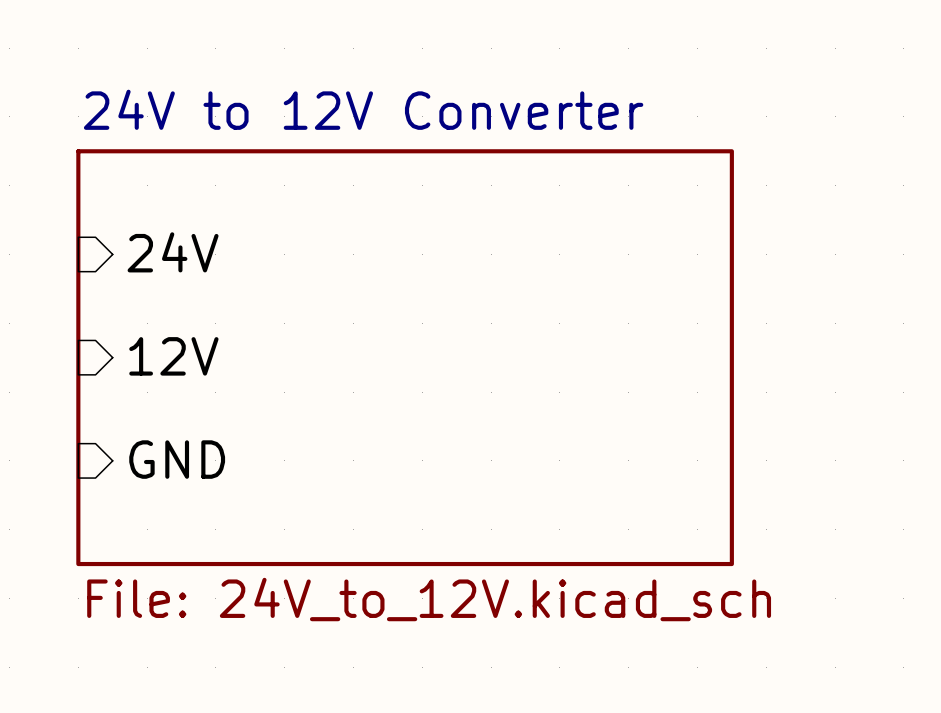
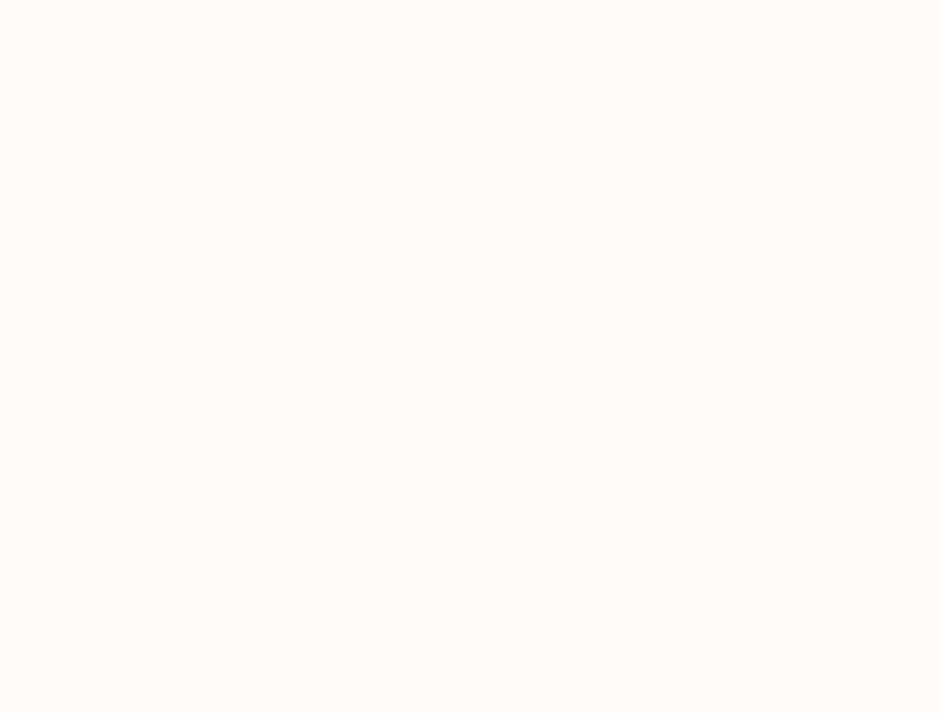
sheet pin: 24V (173, 252) -> none
sheet pin: 12V (173, 356) -> none
sheet 24V to 12V Converter: File: 24V_to_12V.kicad_sch (405, 357) -> none
sheet pin: GND (177, 459) -> none

